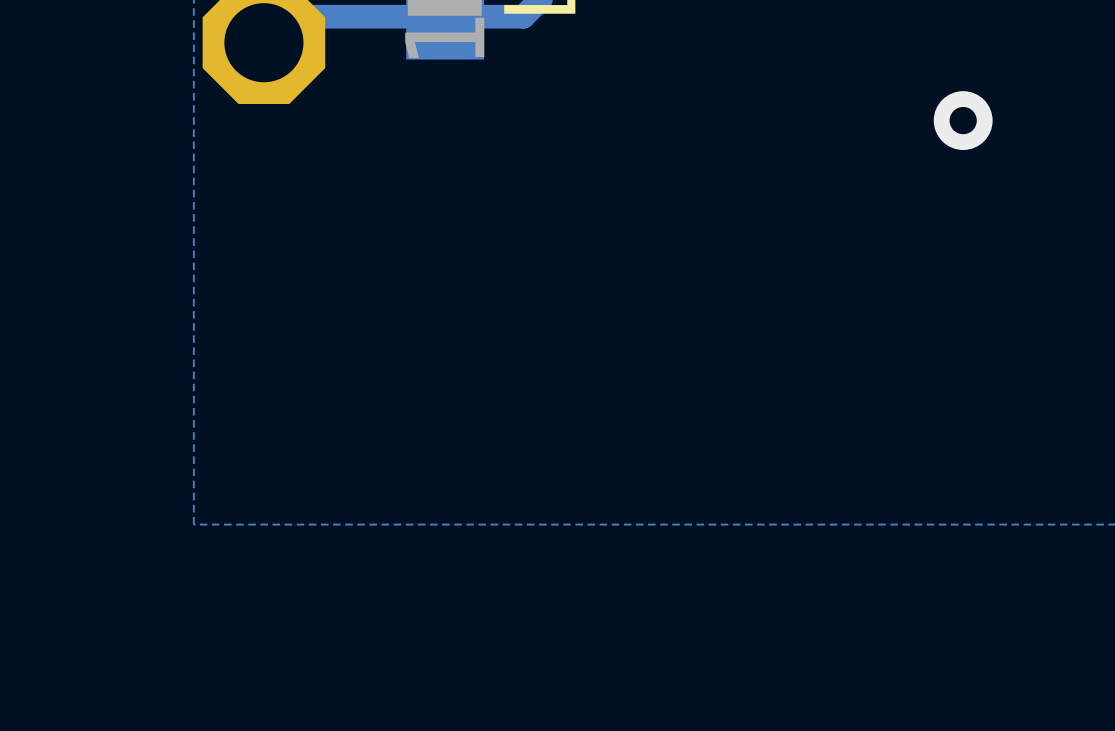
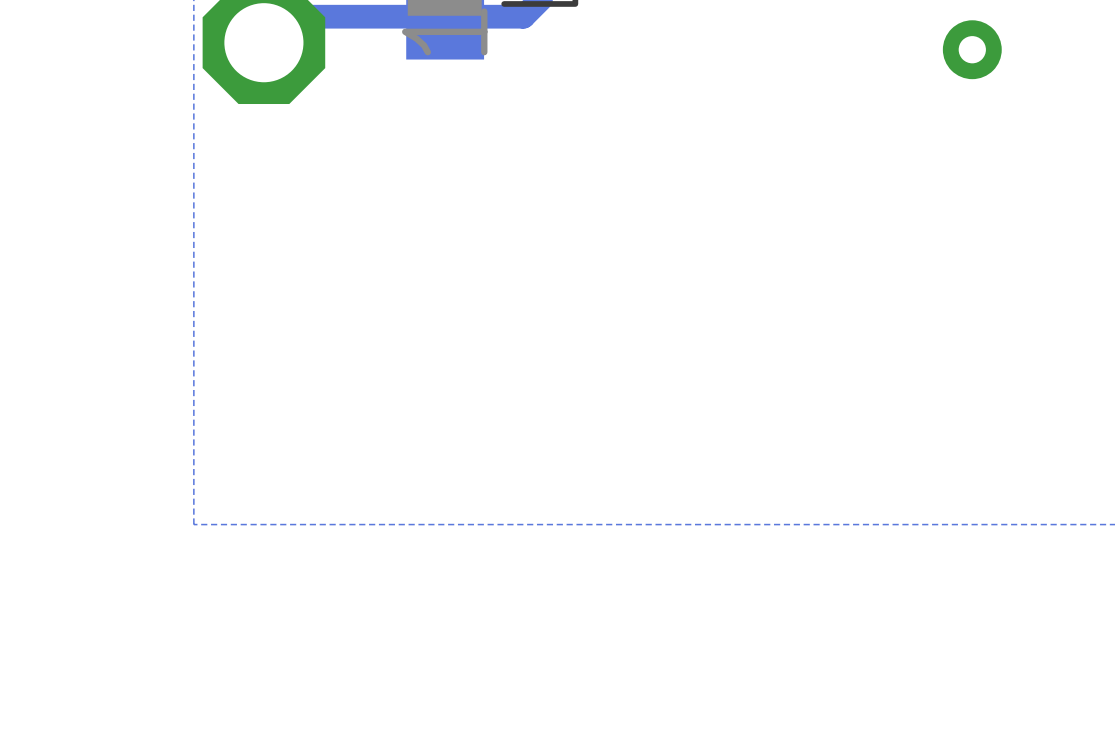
via position: (963, 120) -> (972, 49)

